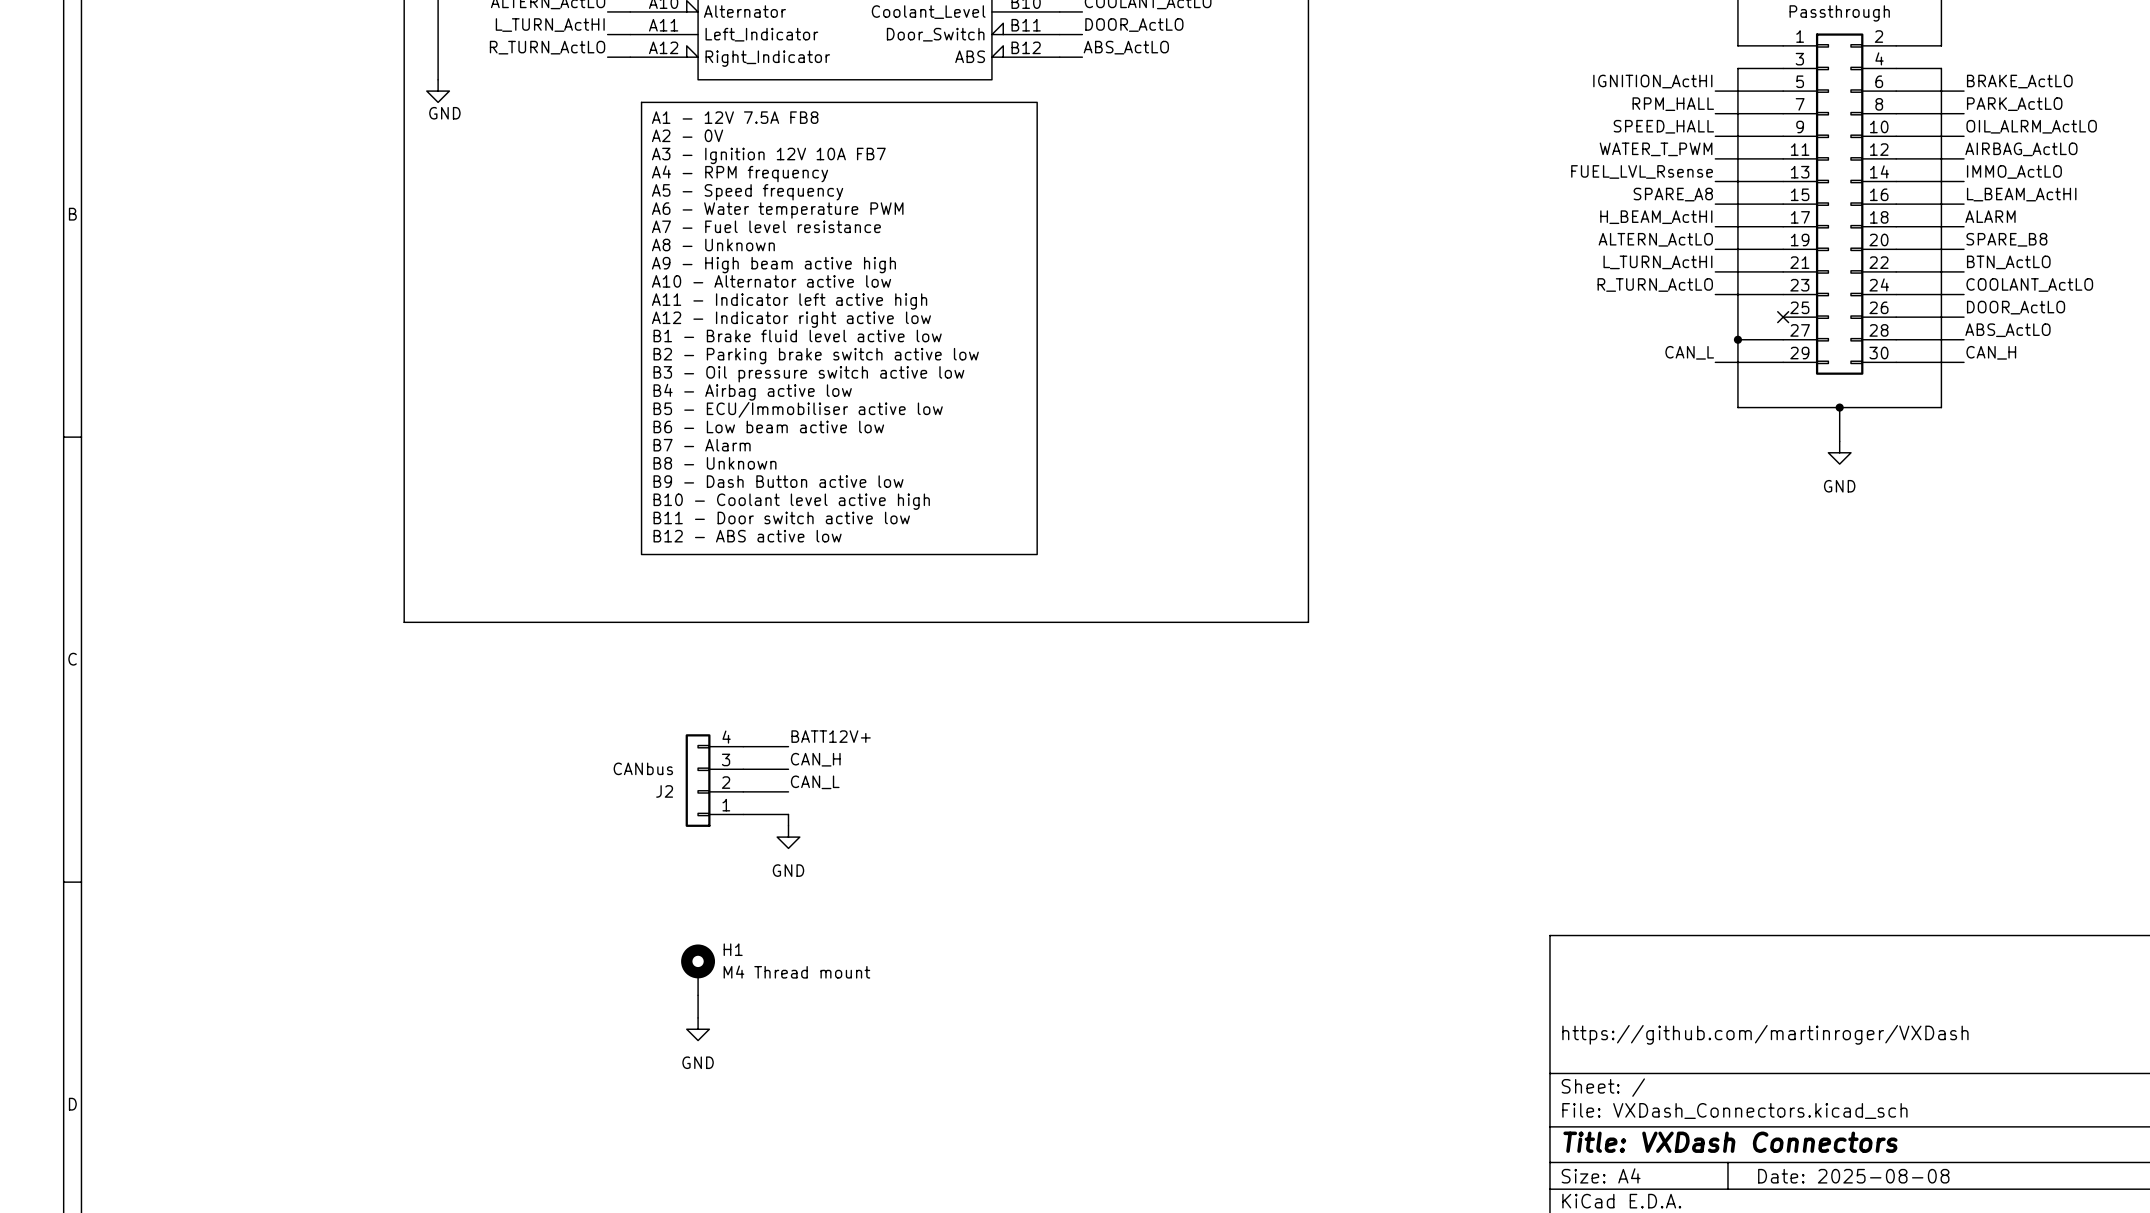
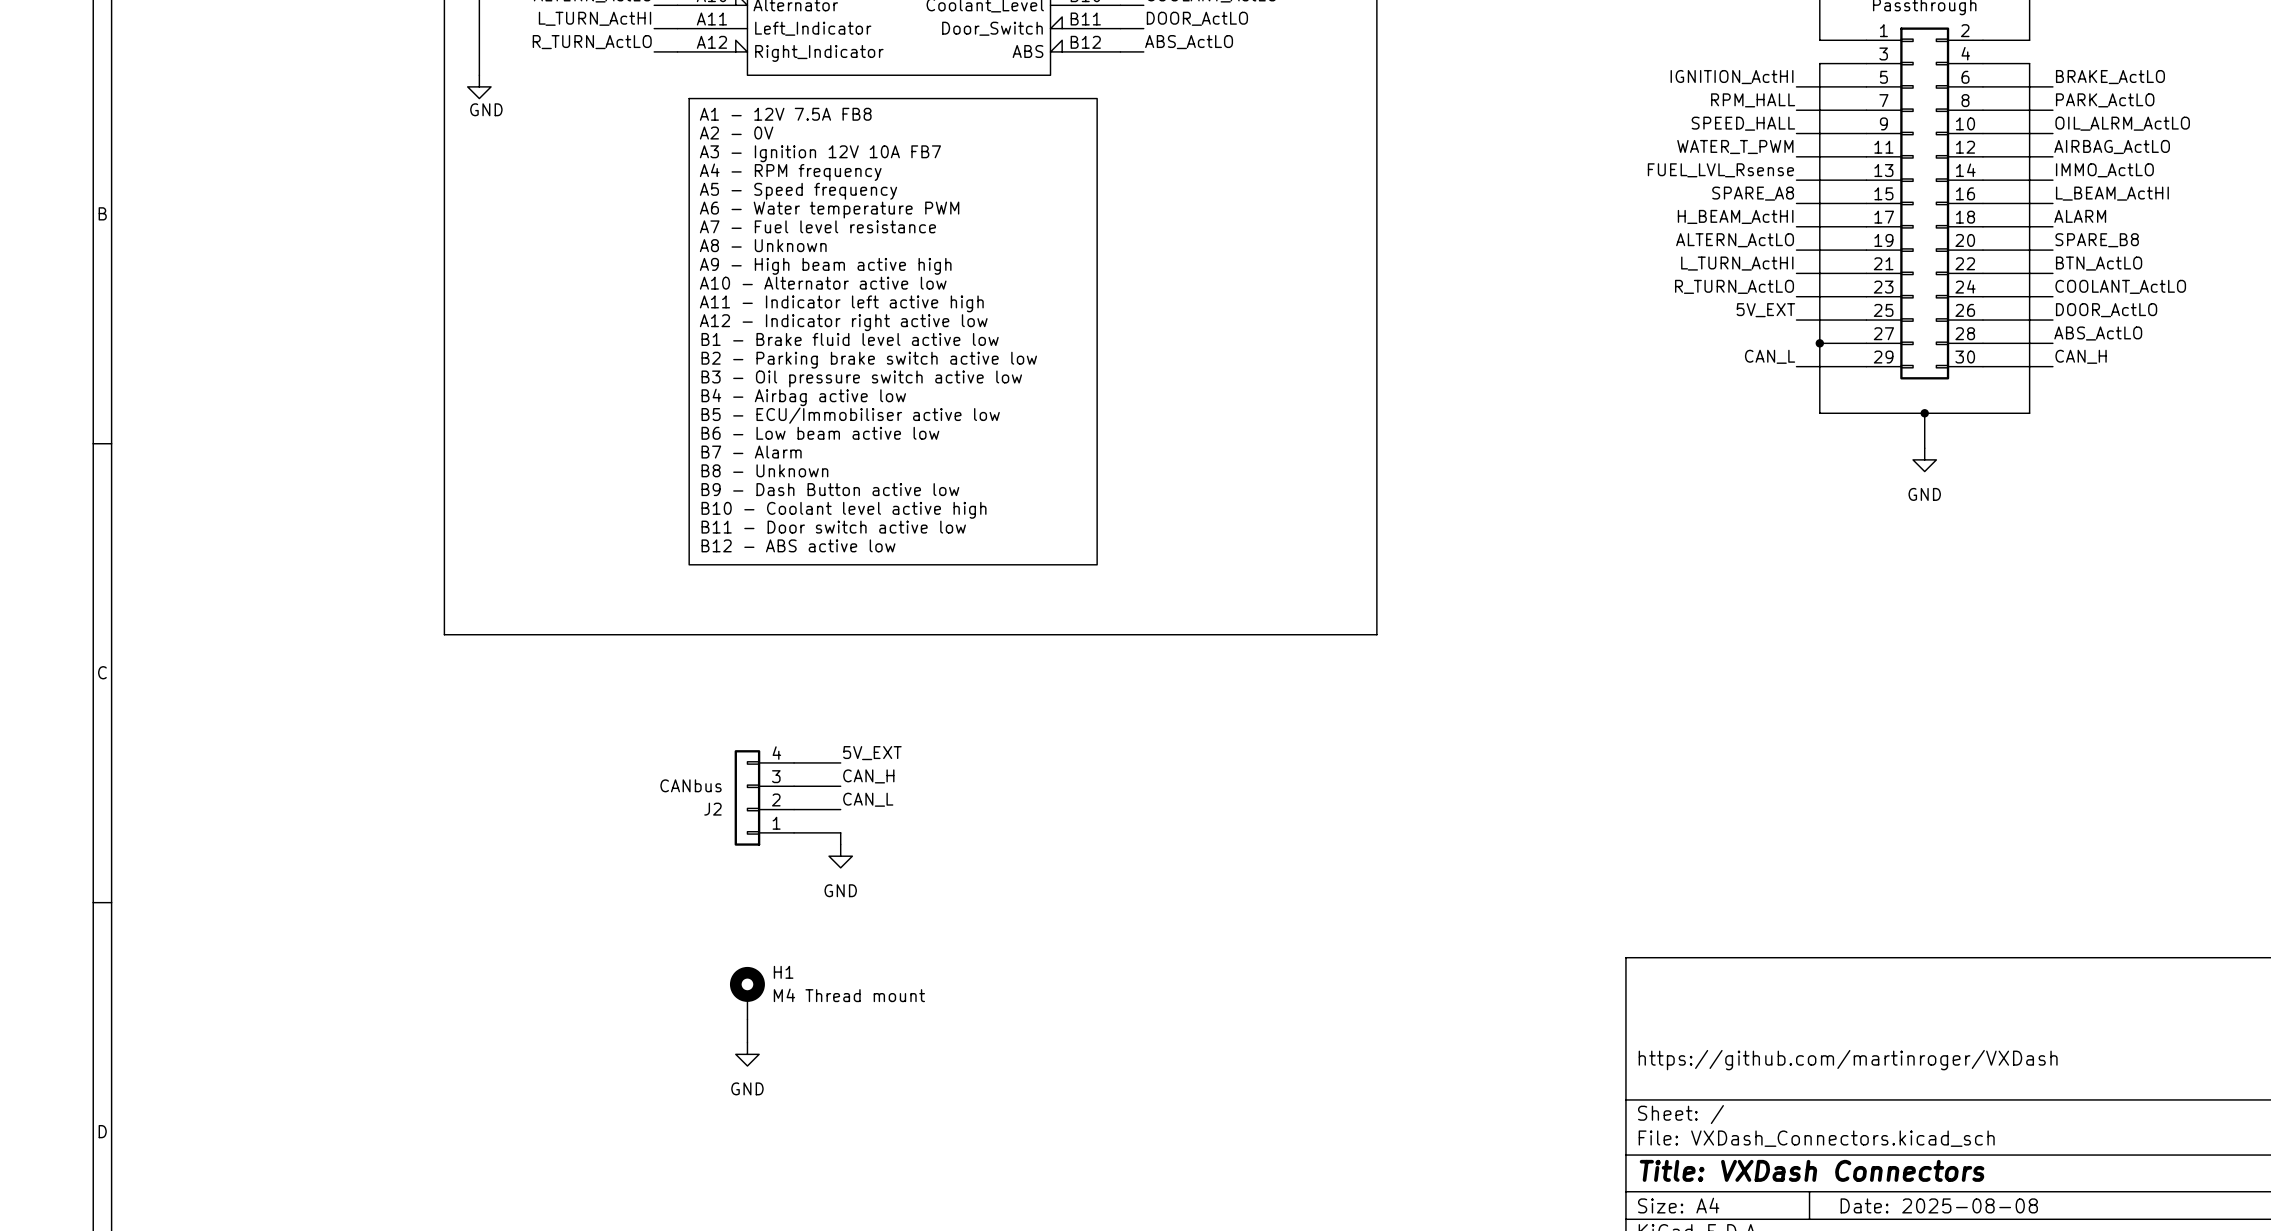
label: none -> 5V_EXT (1765, 310)
wire: none -> (1796, 320) (1866, 320)
no-connect mark: (1783, 317) -> none
label: BATT12V+ (831, 736) -> 5V_EXT (872, 753)

